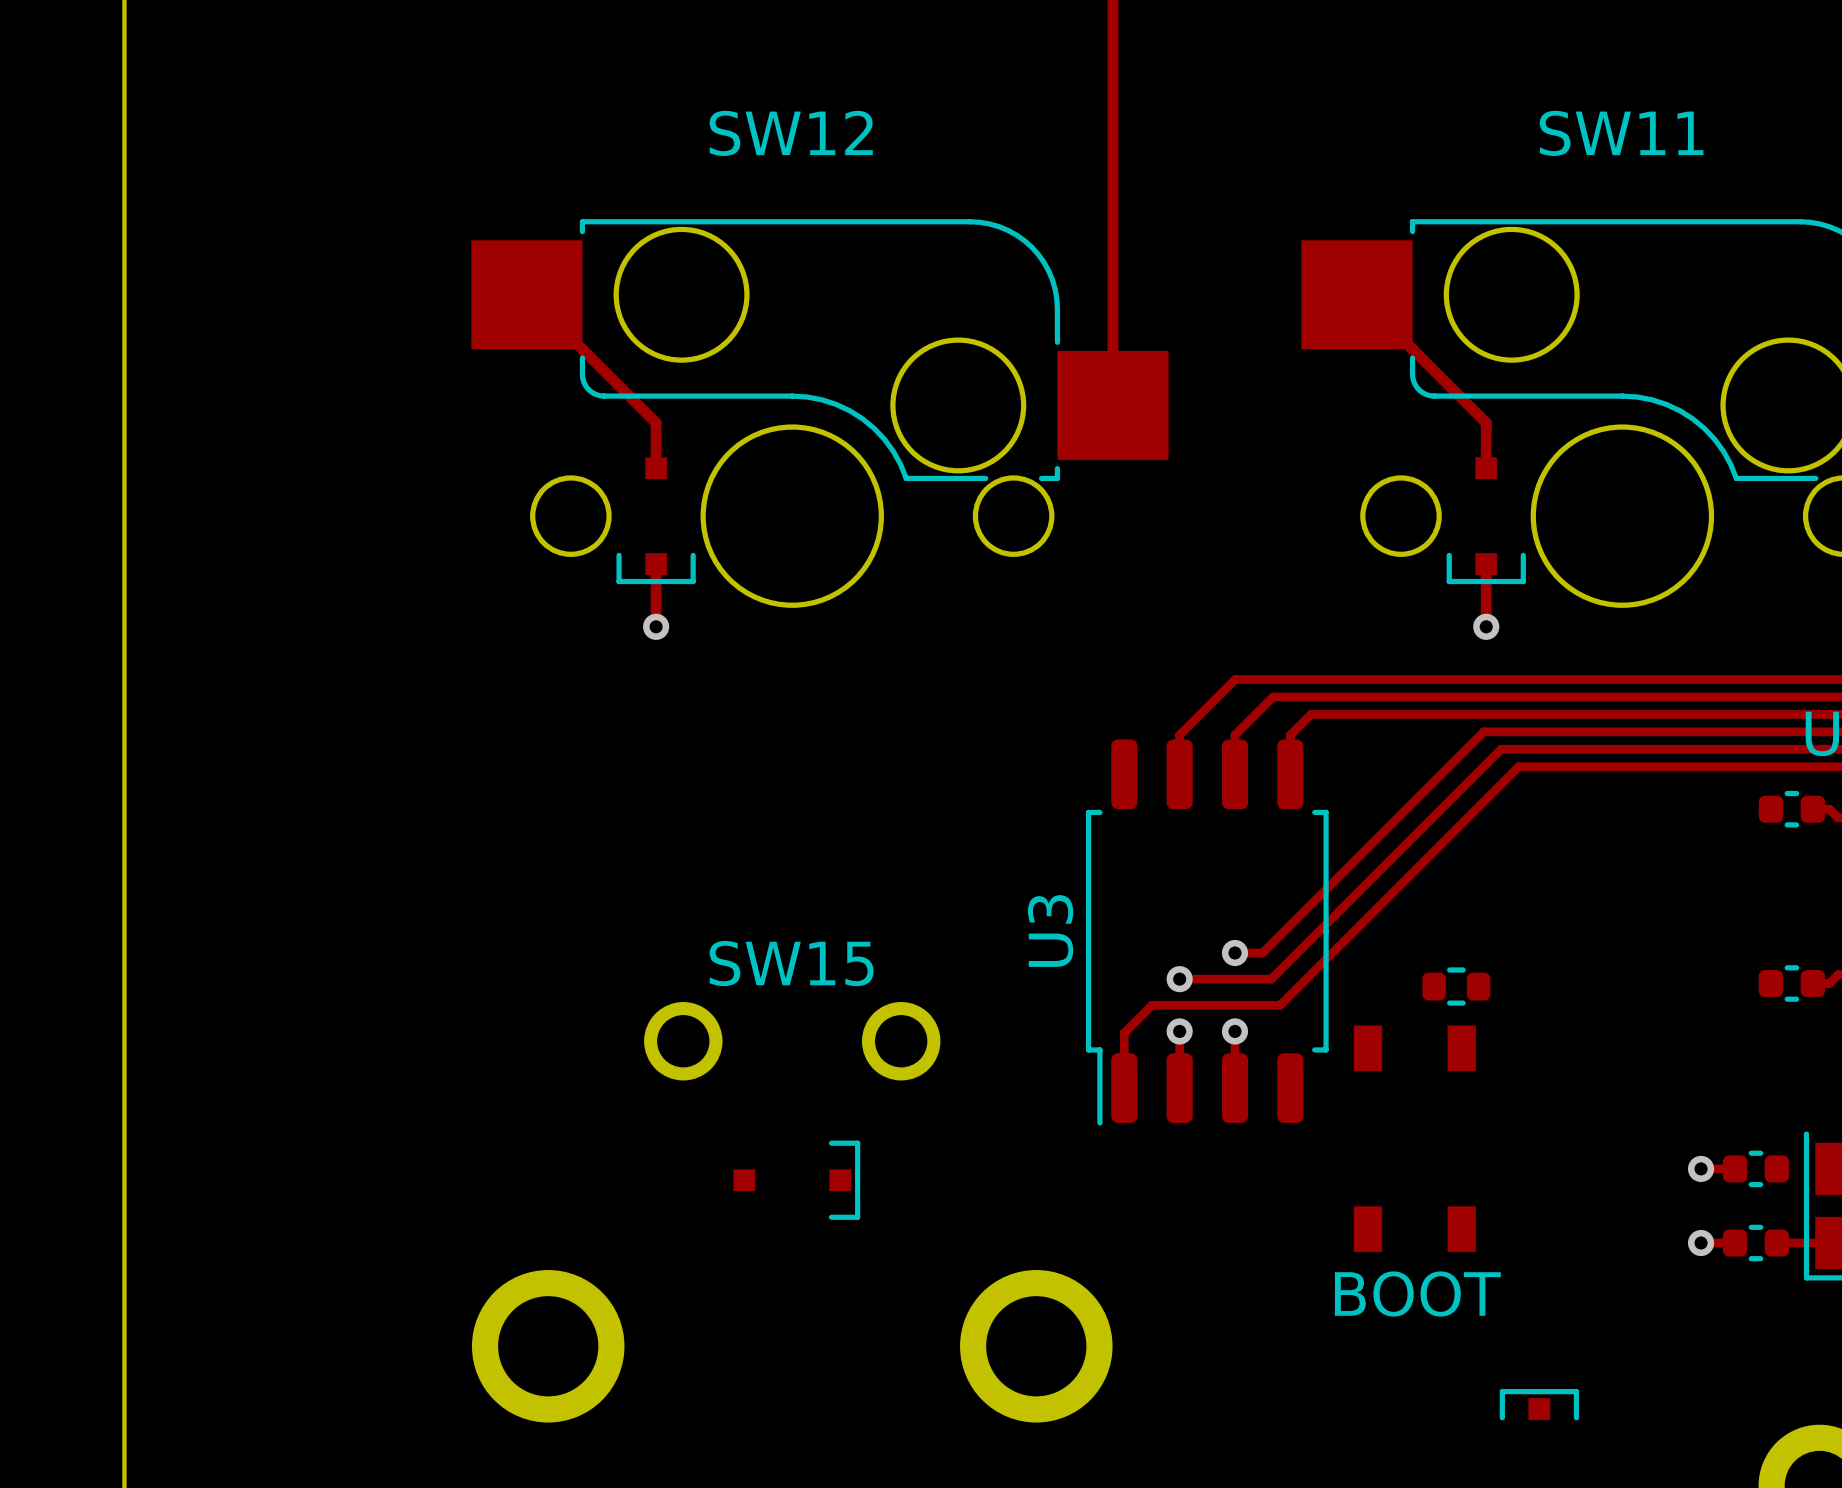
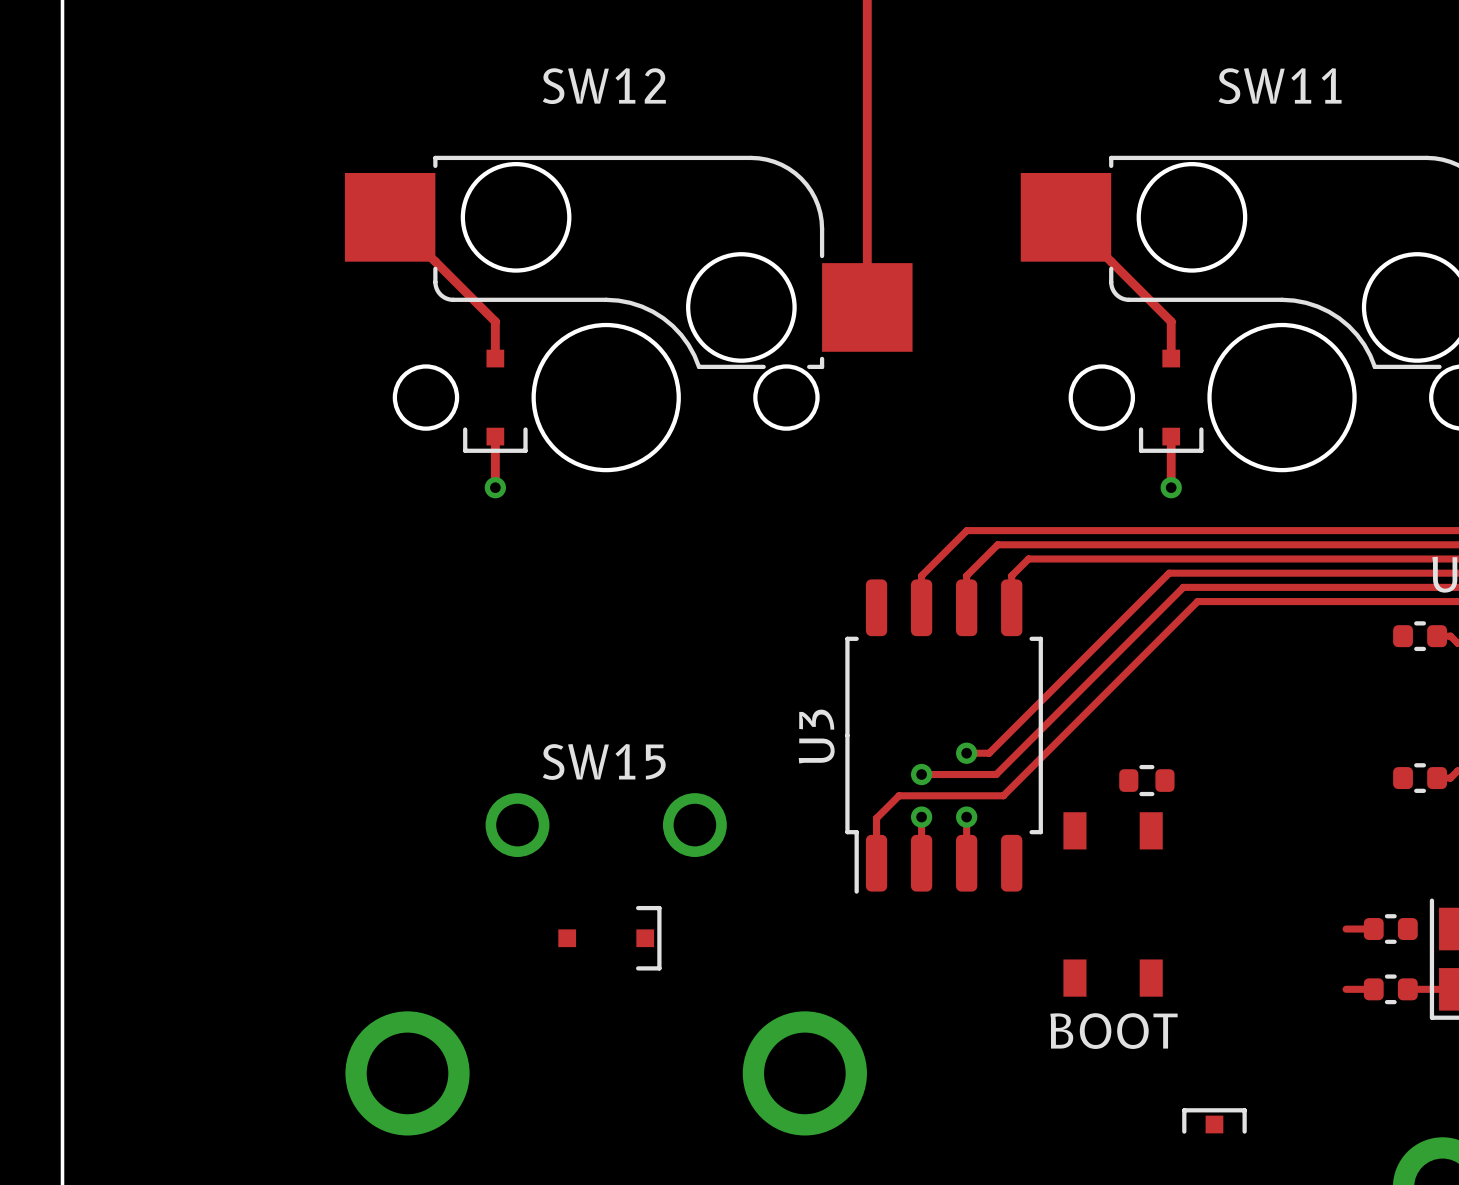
via: (1701, 1168) -> none
via: (1701, 1243) -> none

